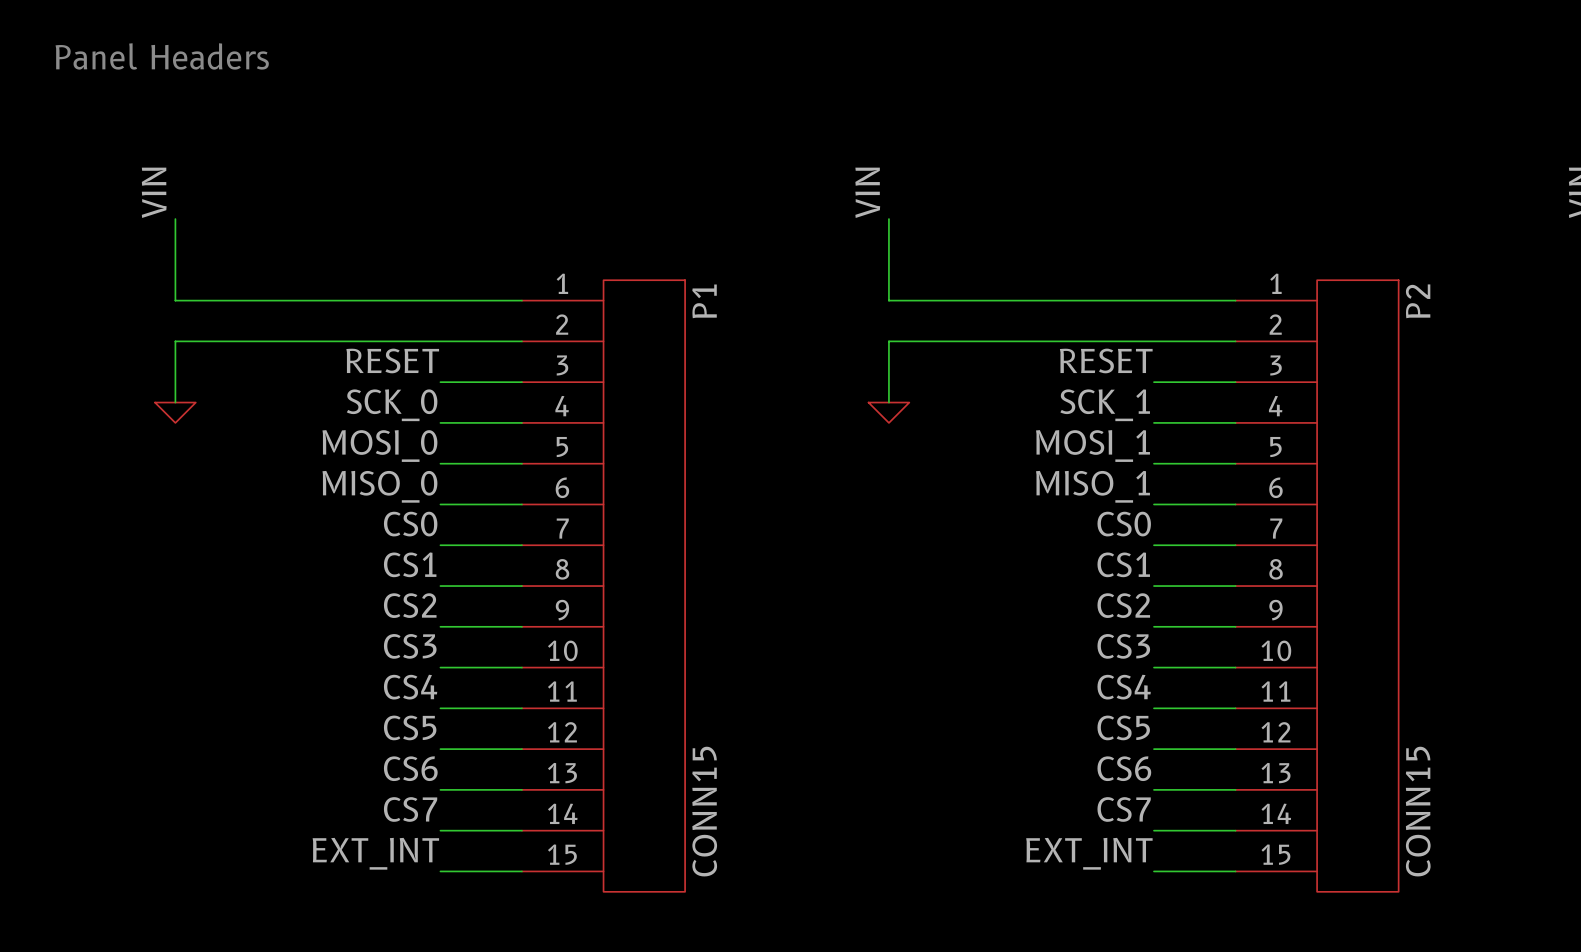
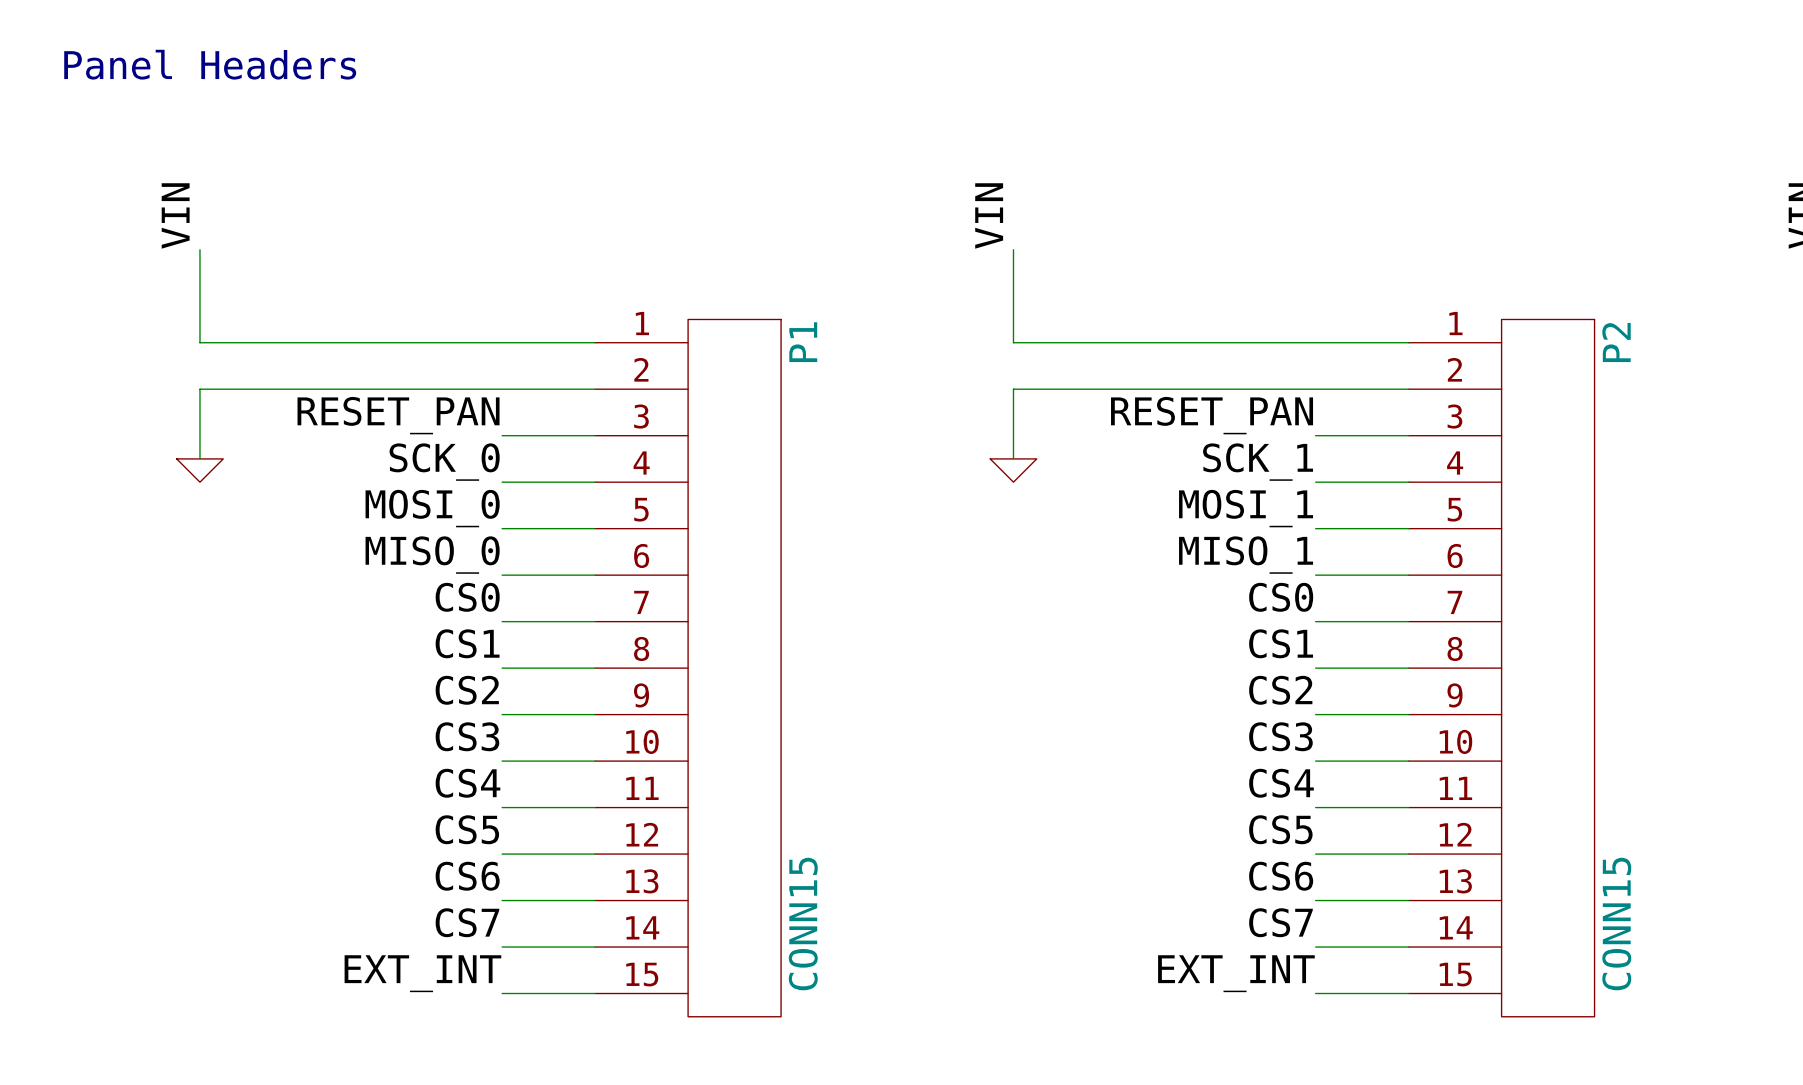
label: RESET (392, 360) -> RESET_PAN (398, 415)
label: RESET (1106, 360) -> RESET_PAN (1212, 415)

